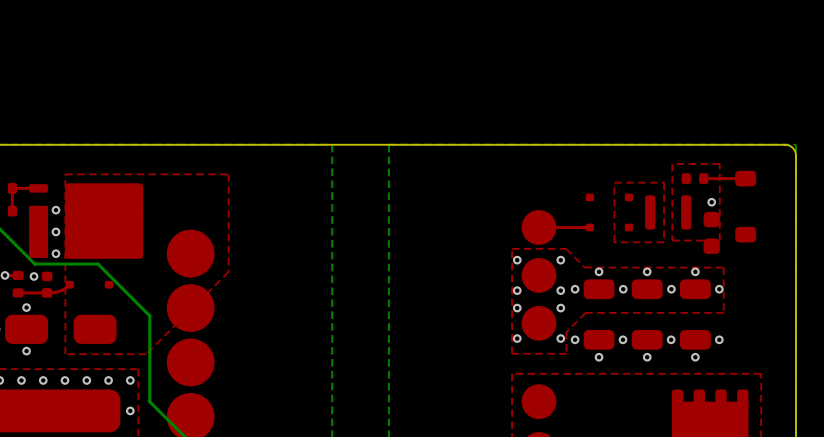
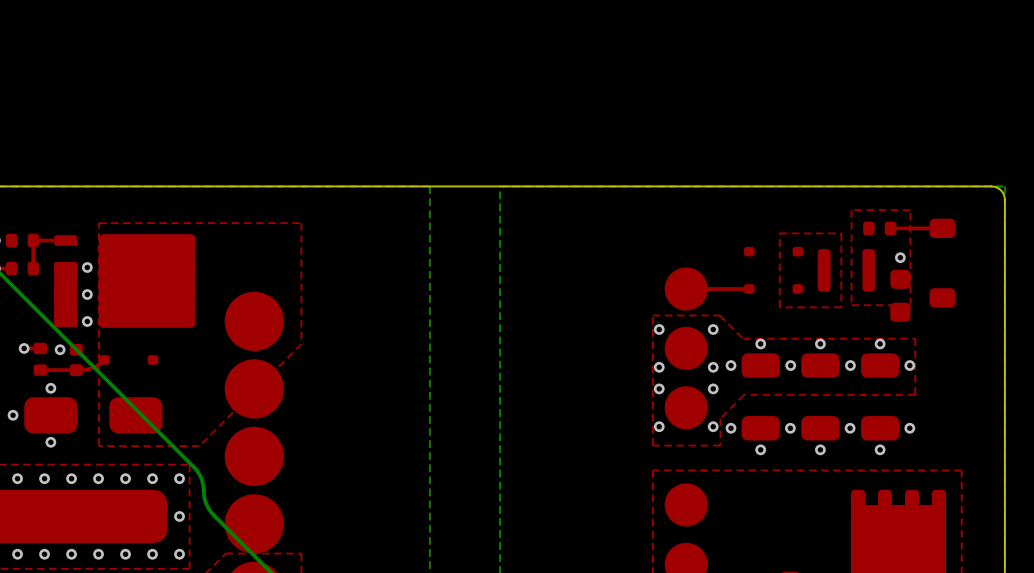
bottom track: (34, 264) (97, 264) (149, 315) (149, 401) (158, 410) -> (61, 334) (196, 469) (202, 480) (206, 504) (213, 515)

